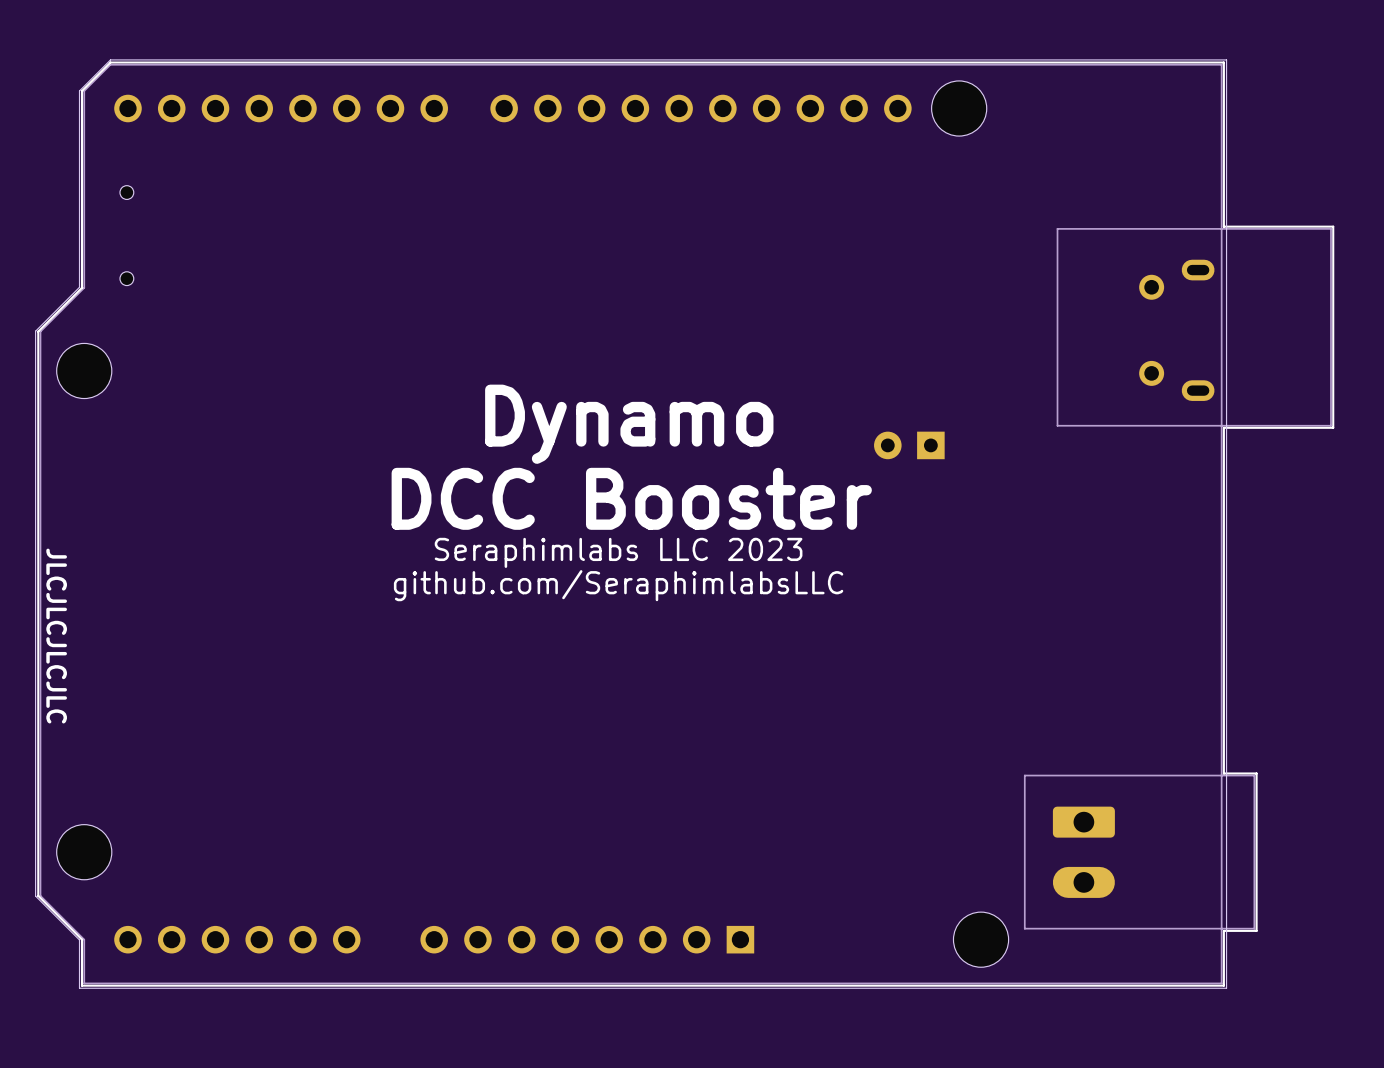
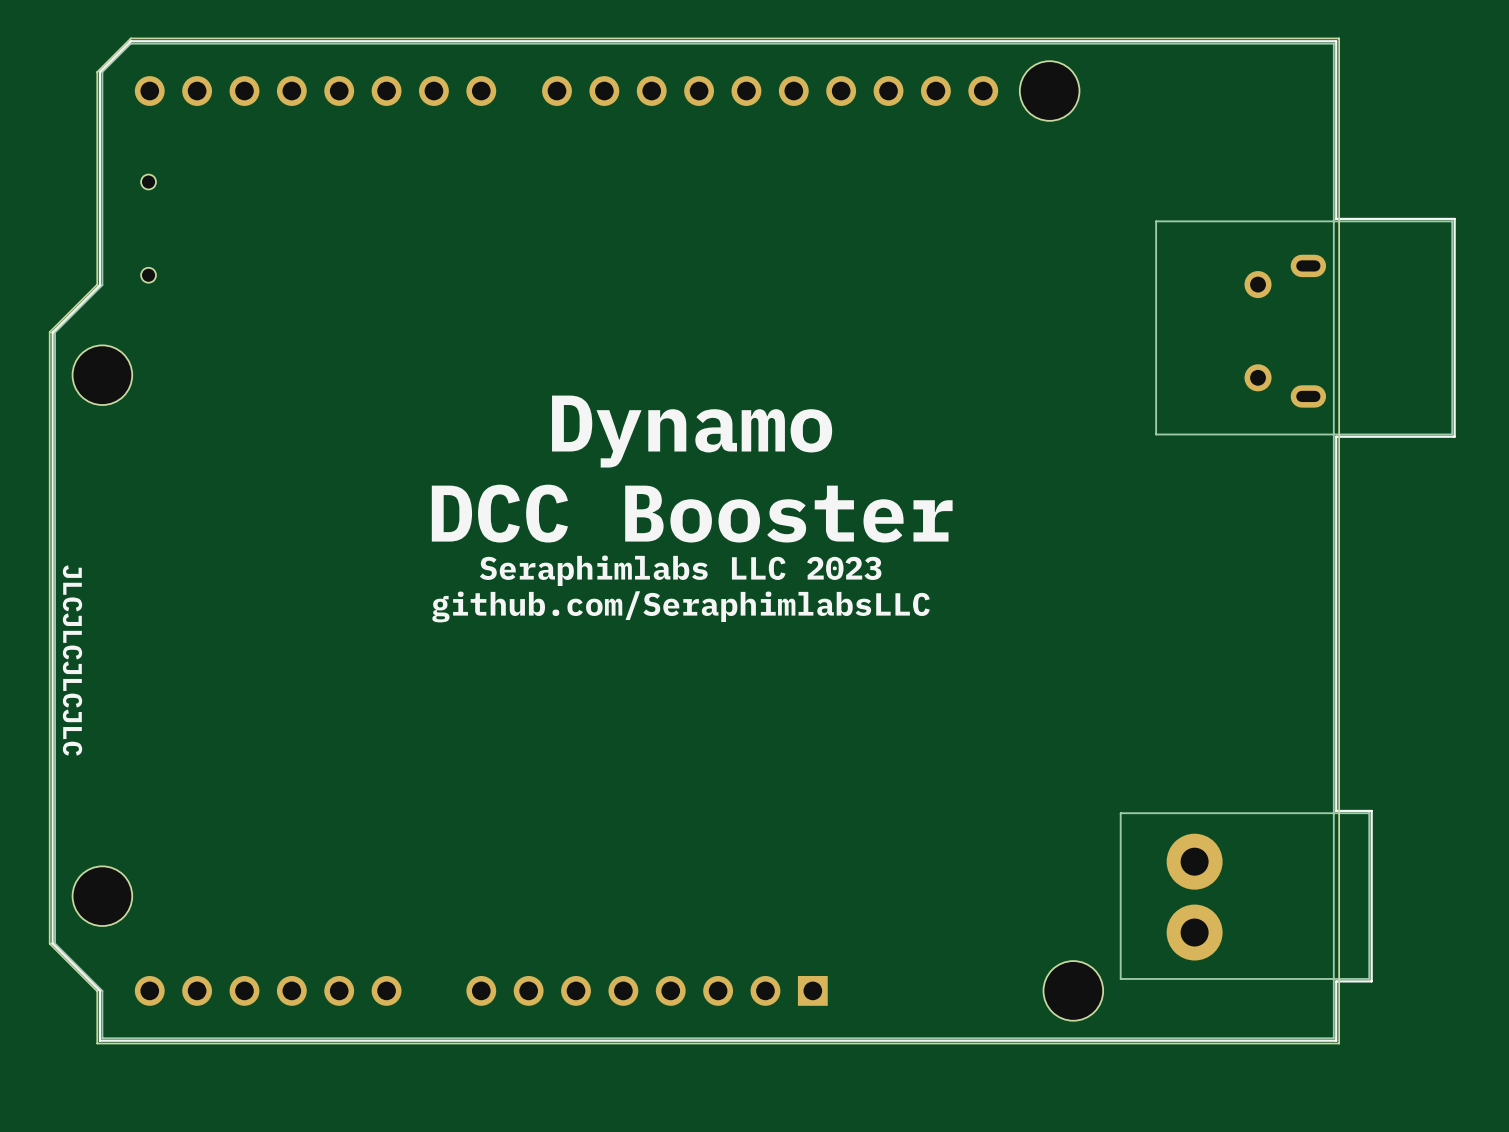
part: (909, 445) -> none
part footprint: [1052, 806, 1115, 898] -> [1166, 833, 1223, 961]

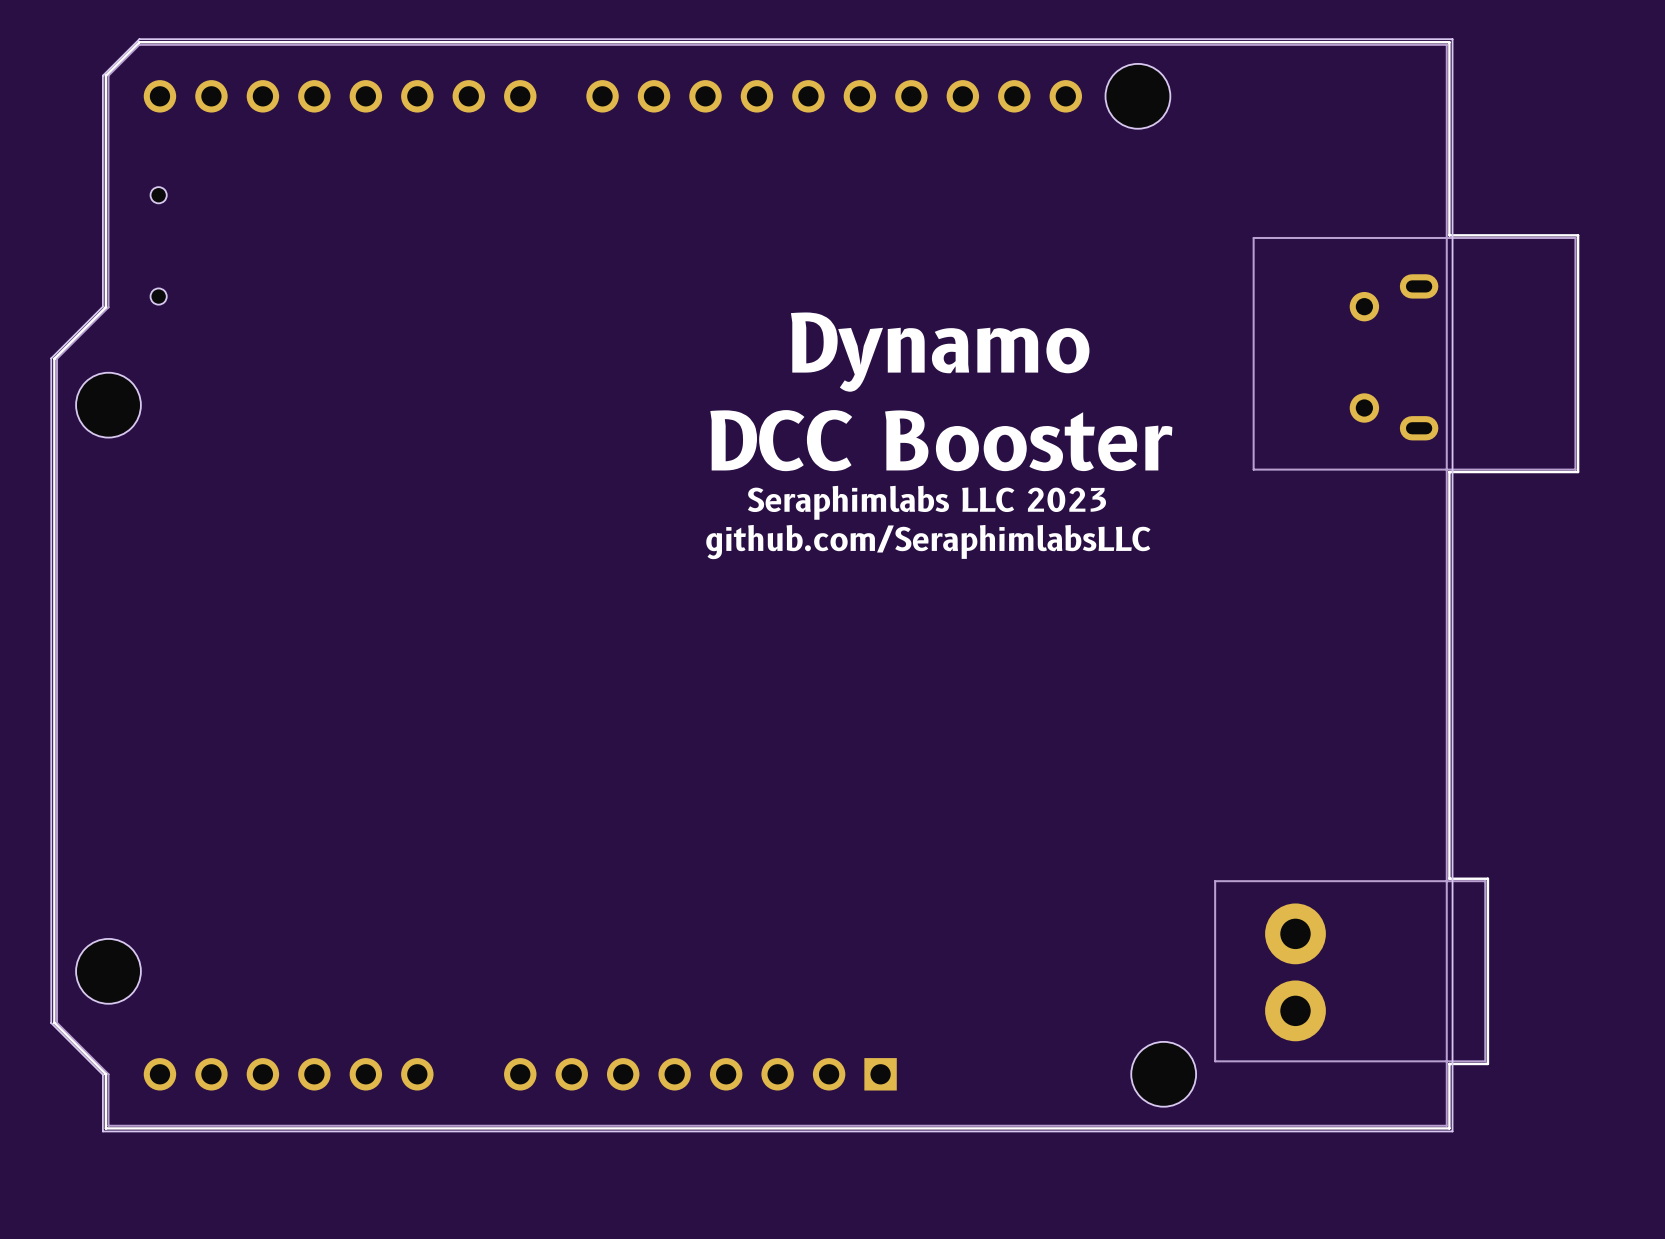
text position: Dynamo (692, 431) -> Dynamo (940, 352)
text position: DCC Booster (692, 513) -> DCC Booster (941, 440)
text position: Seraphimlabs LLC 2023 (680, 570) -> Seraphimlabs LLC 2023 (926, 502)
text position: github.com/SeraphimlabsLLC (681, 606) -> github.com/SeraphimlabsLLC (928, 542)
text: JLCJLCJLCJLC (72, 660) -> none

